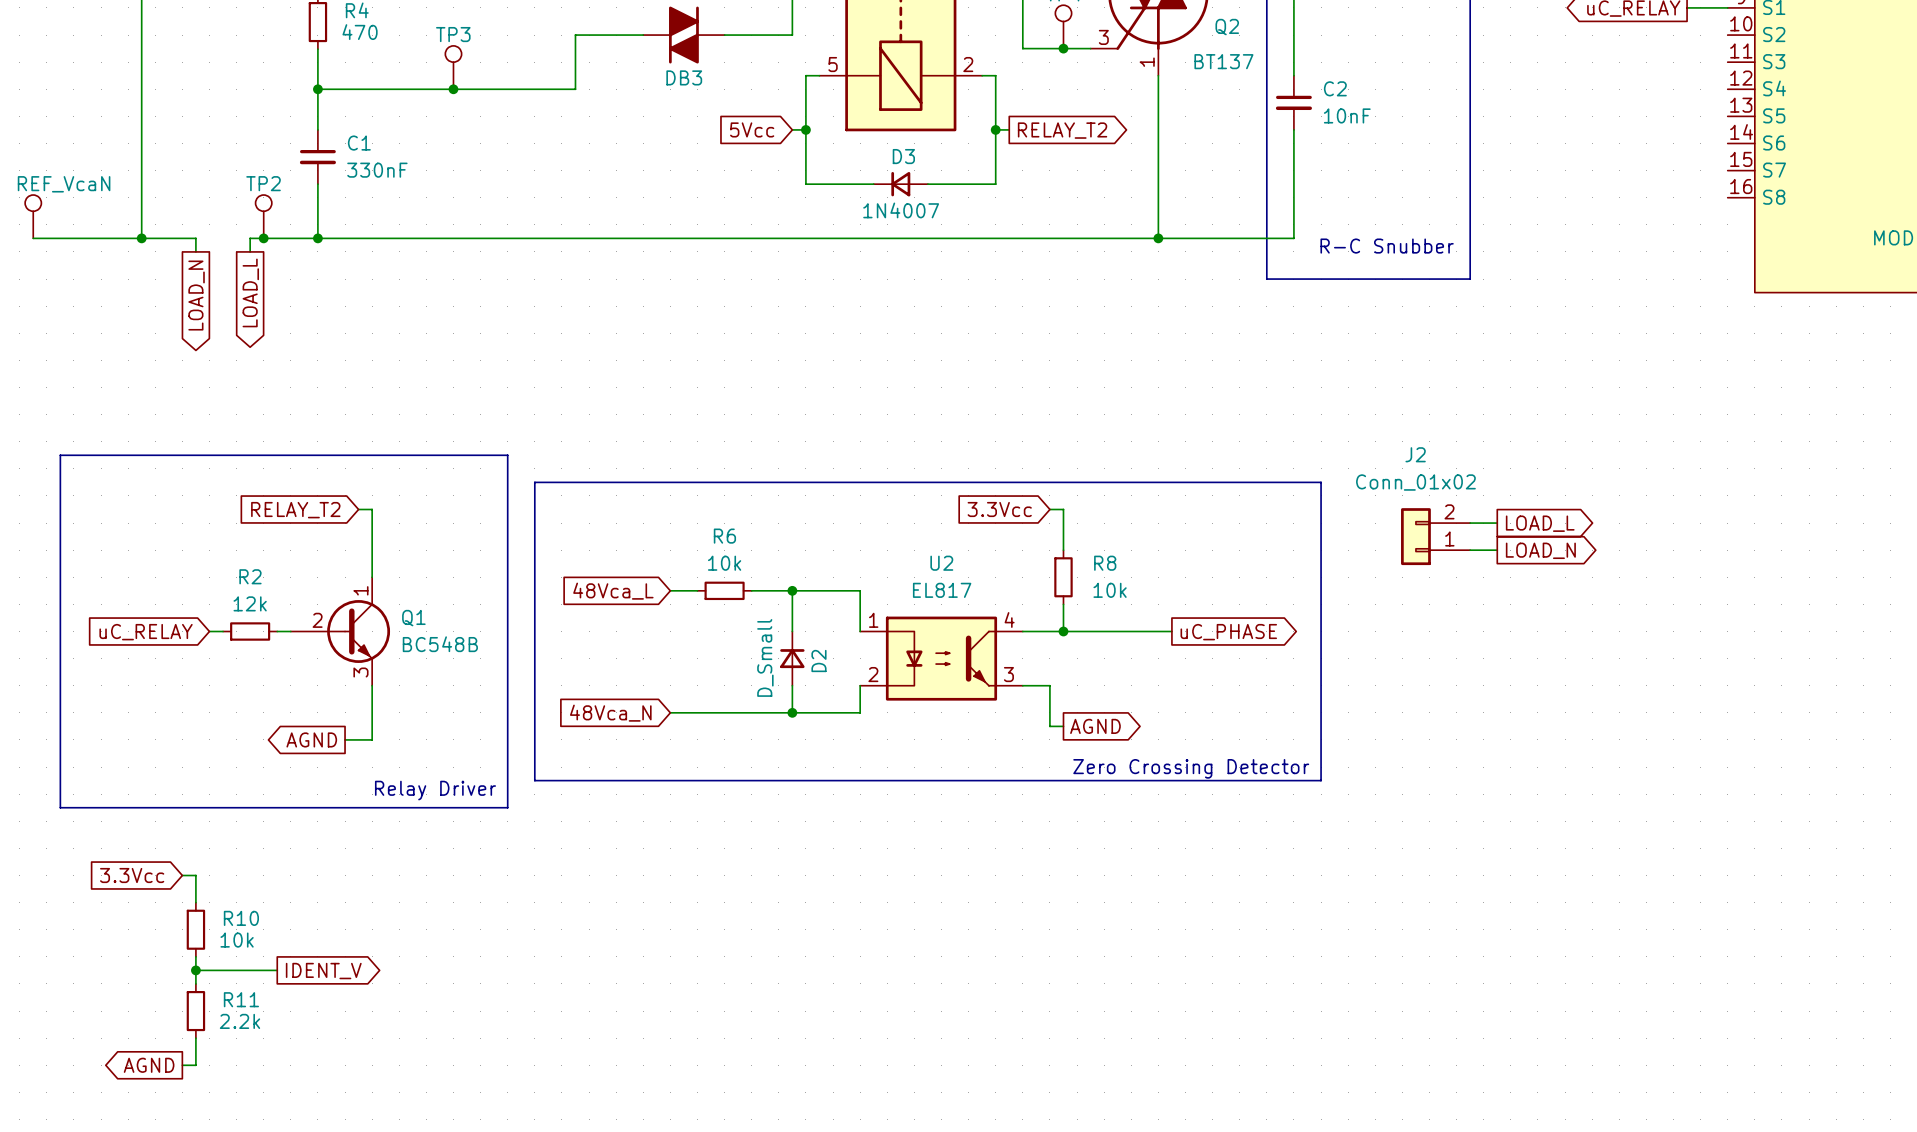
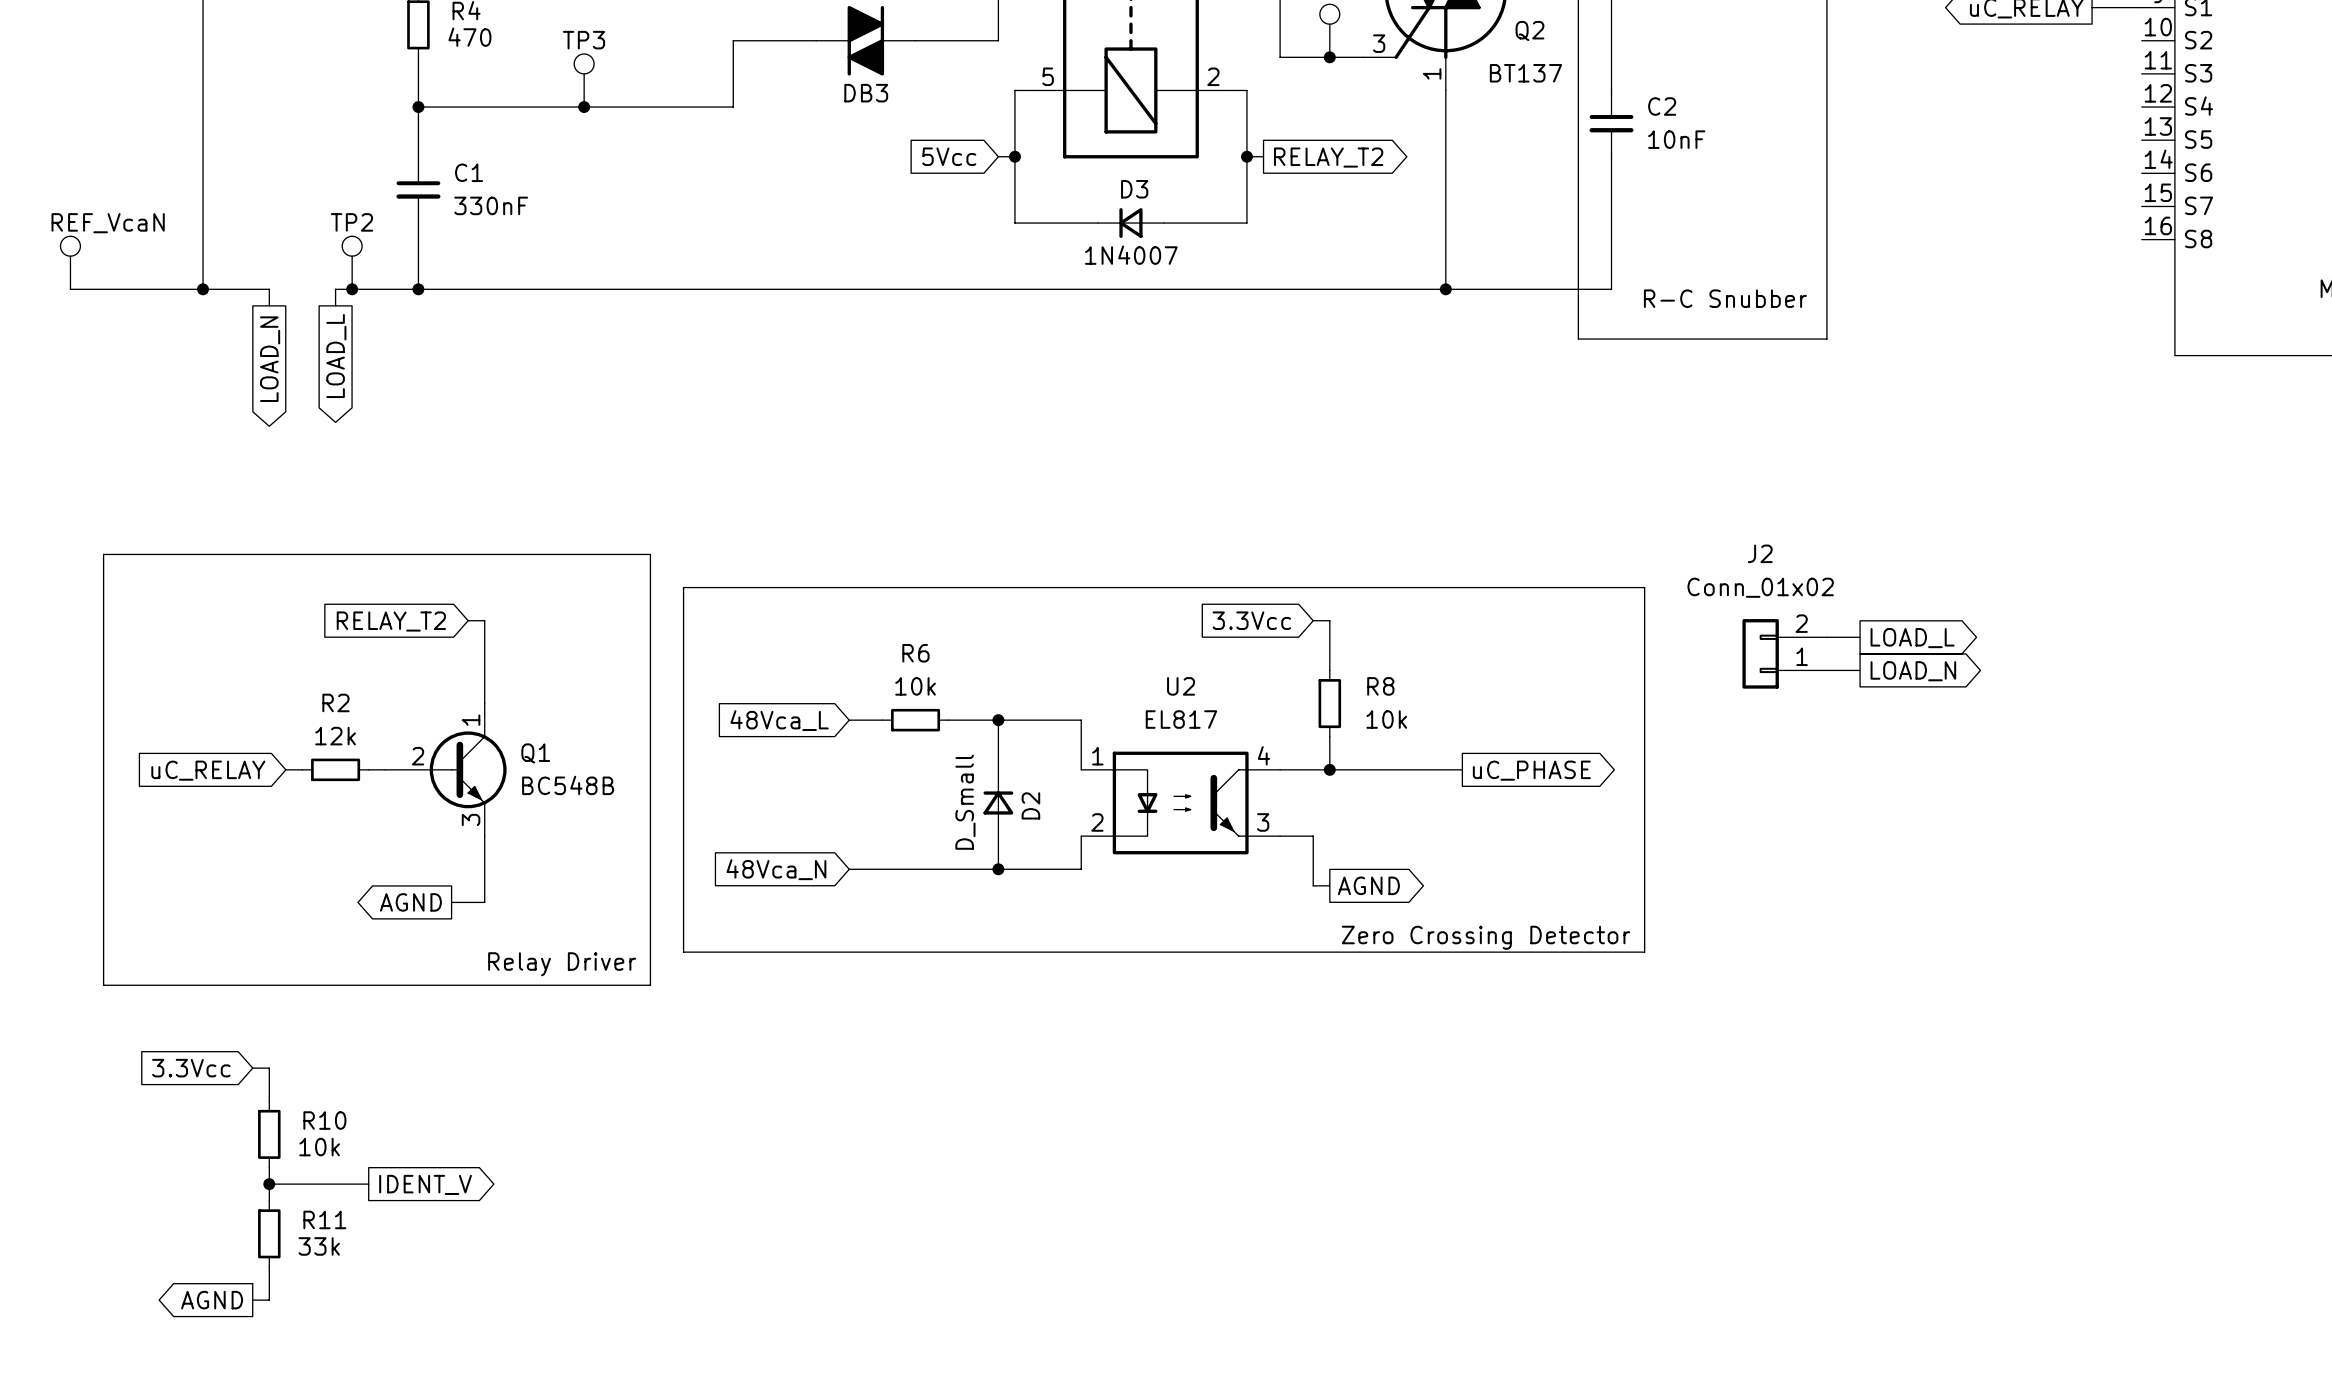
R11 value: 2.2k (239, 1021) -> 33k (319, 1246)

